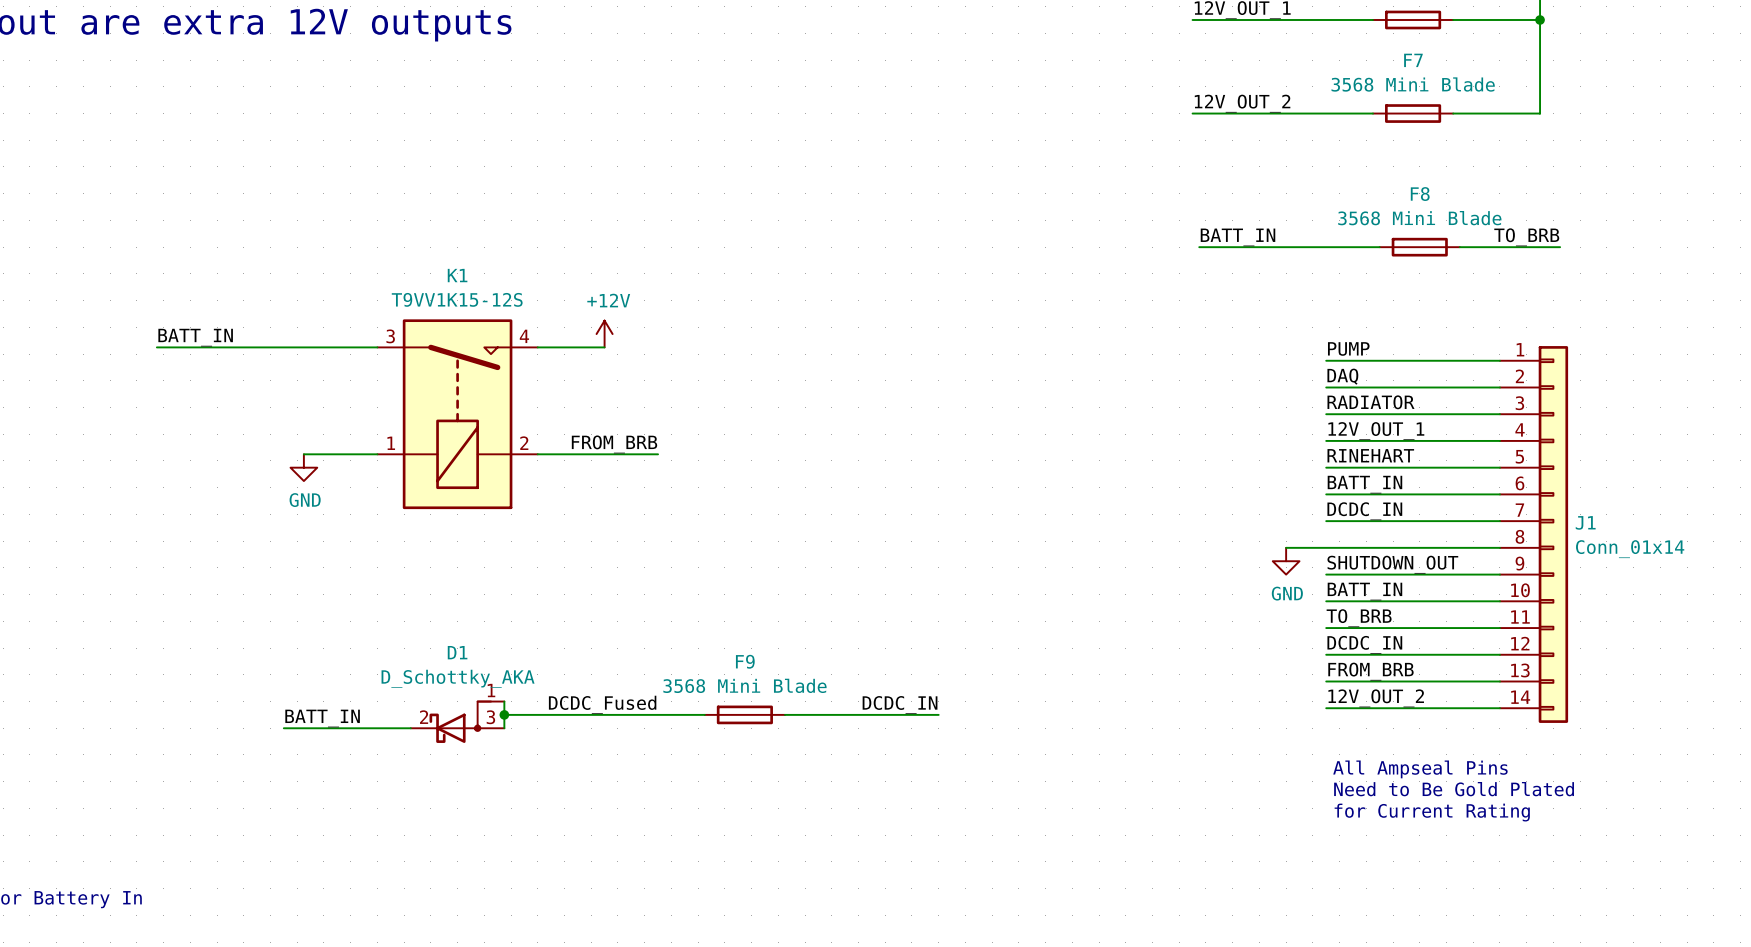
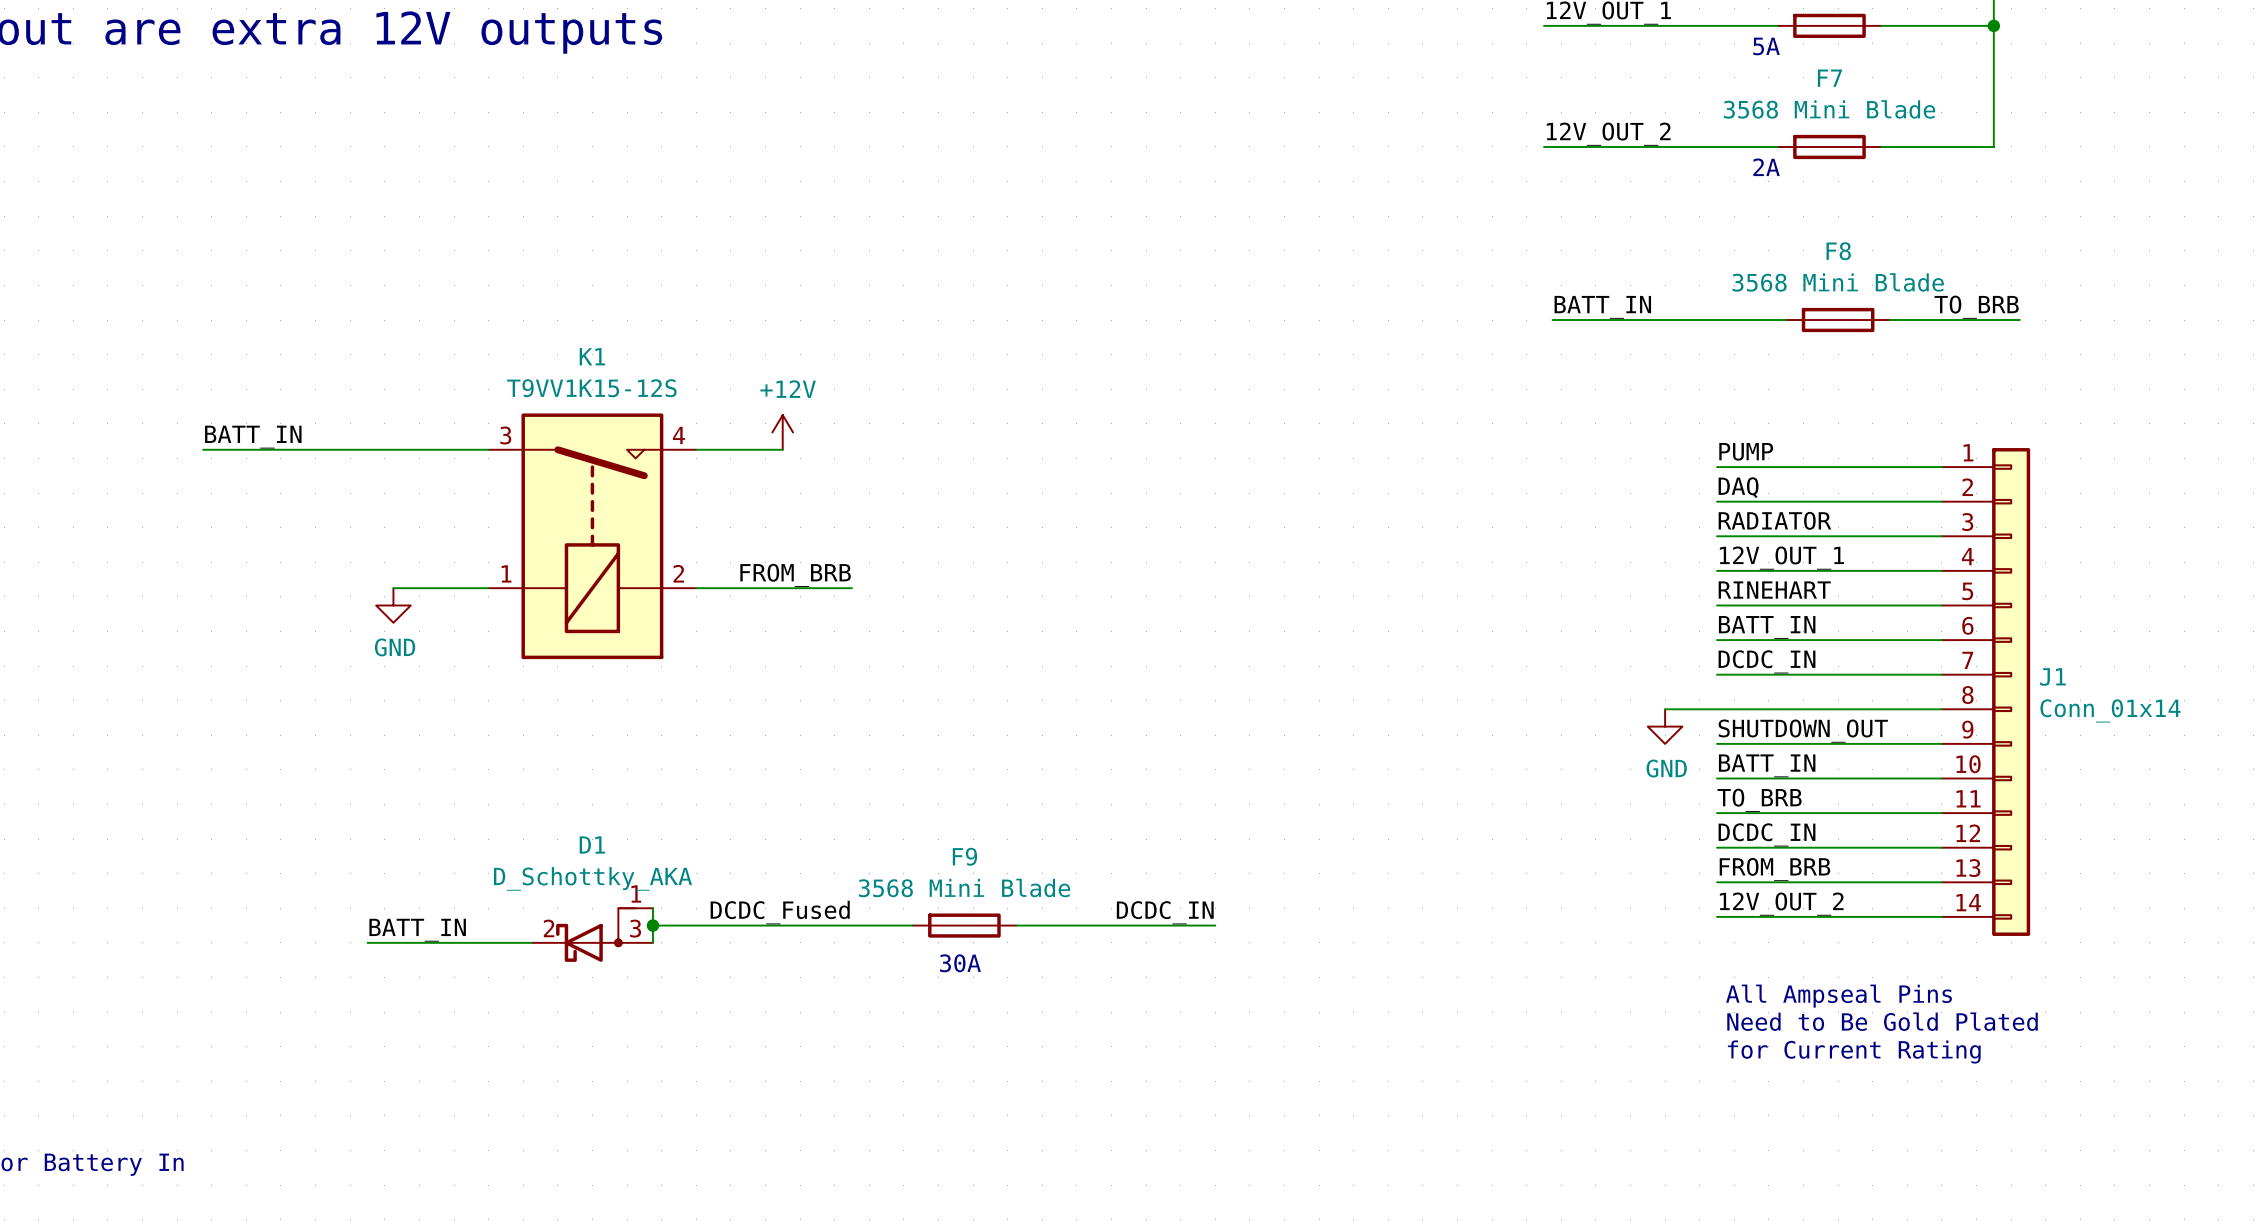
text: none -> 5A (1766, 46)
text: none -> 2A (1766, 167)
text: none -> 30A (960, 963)

